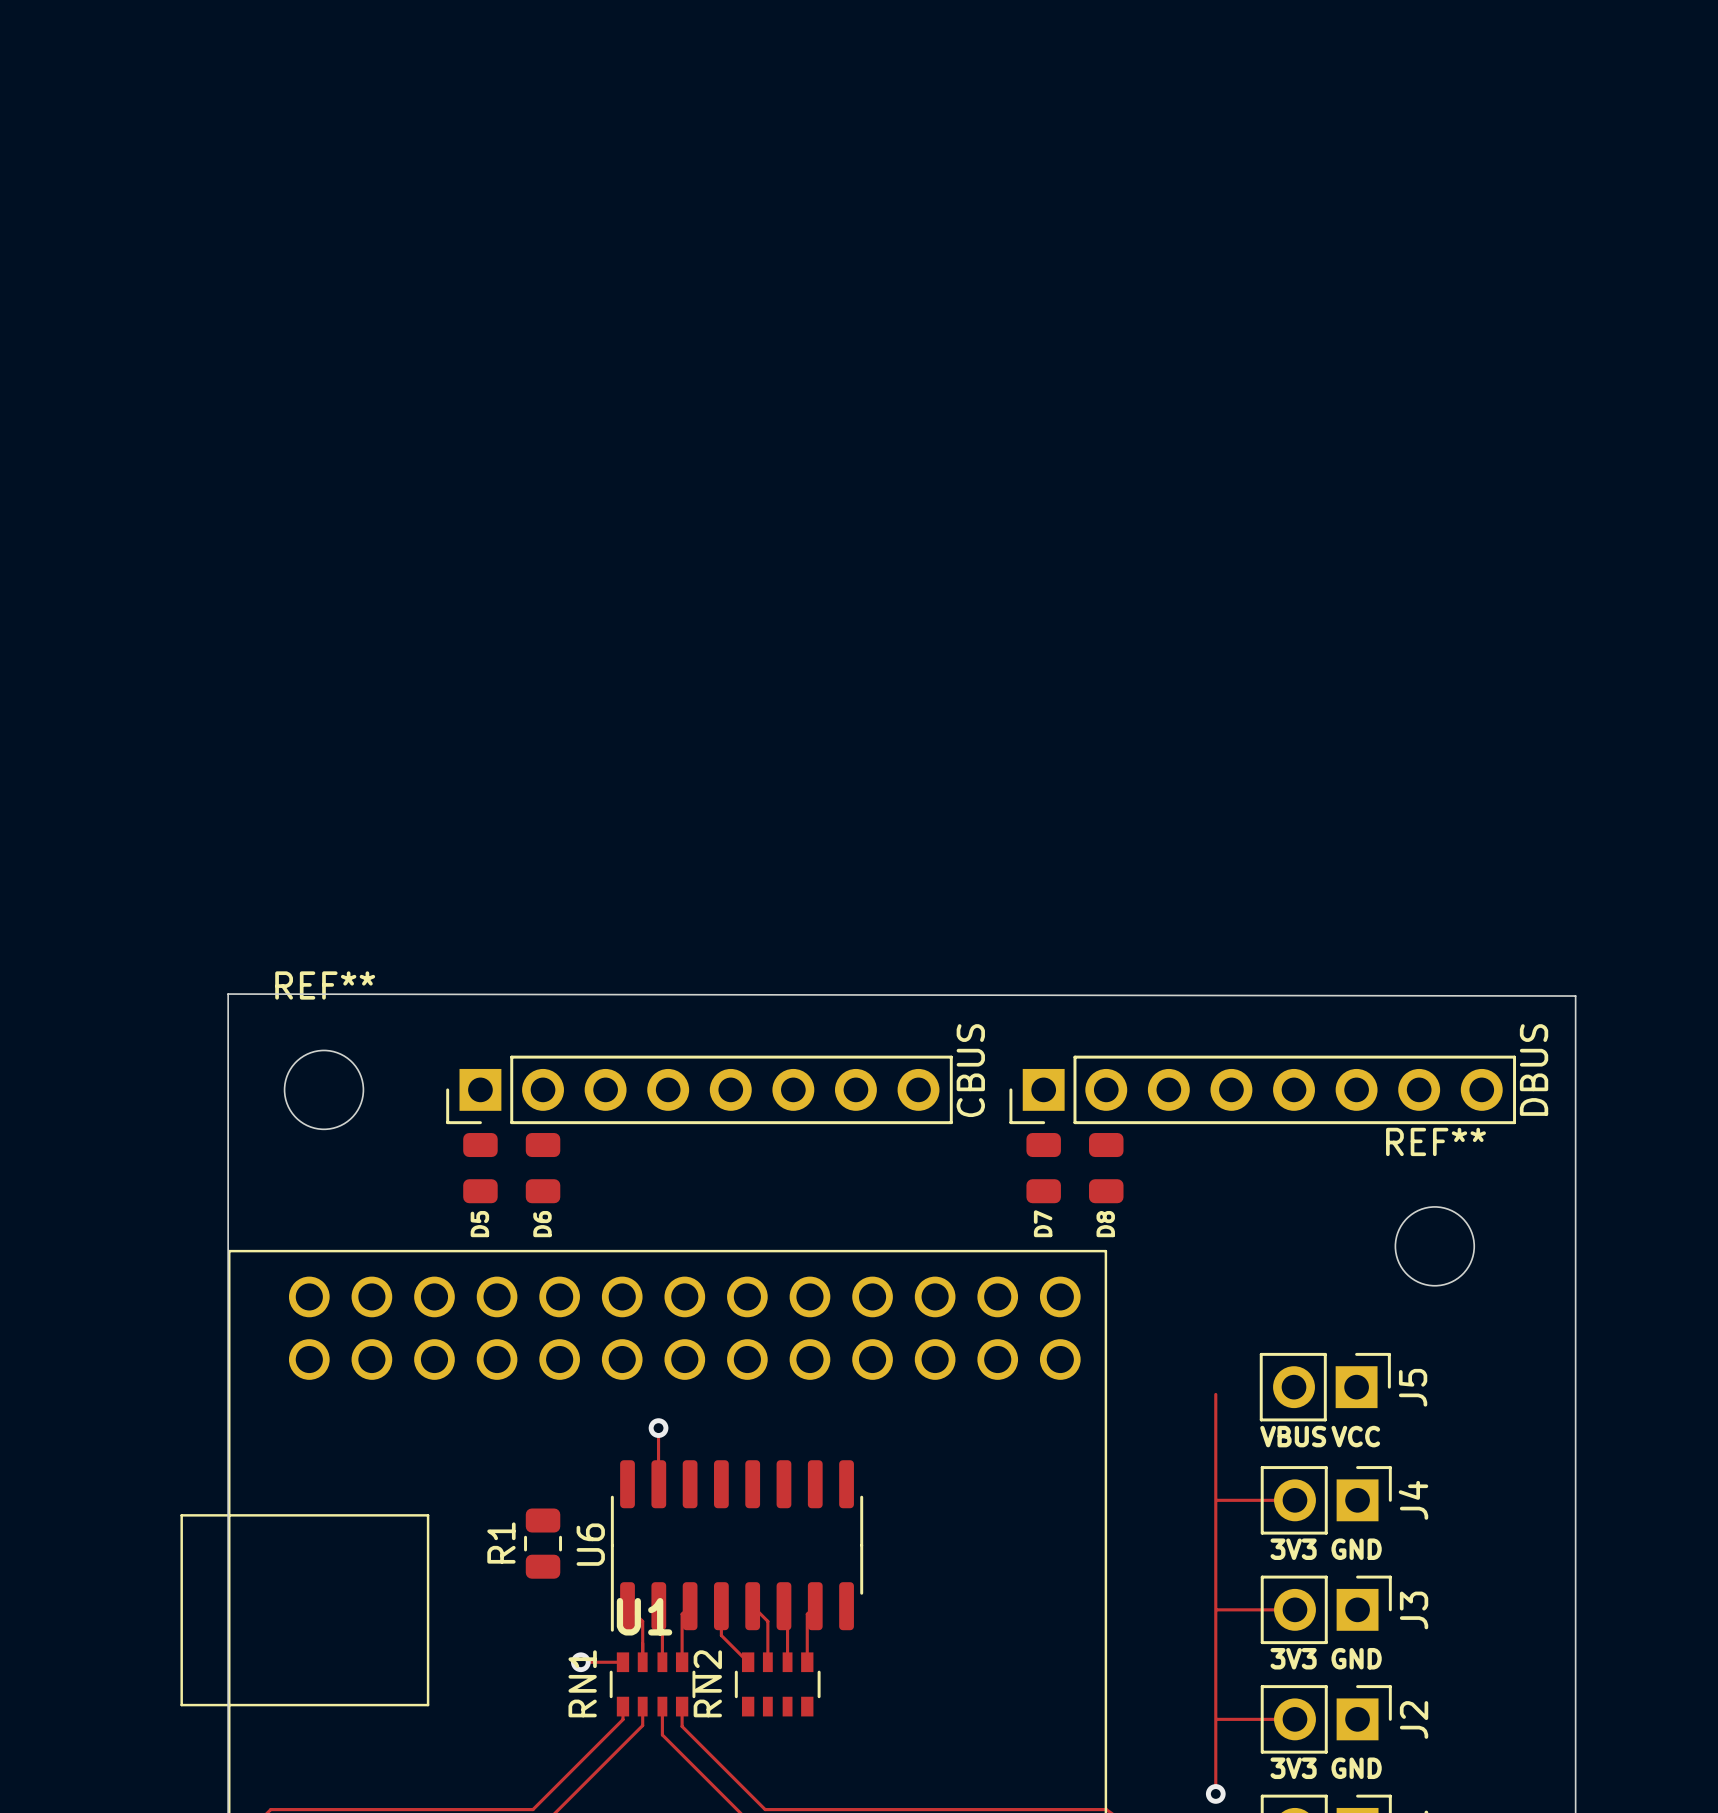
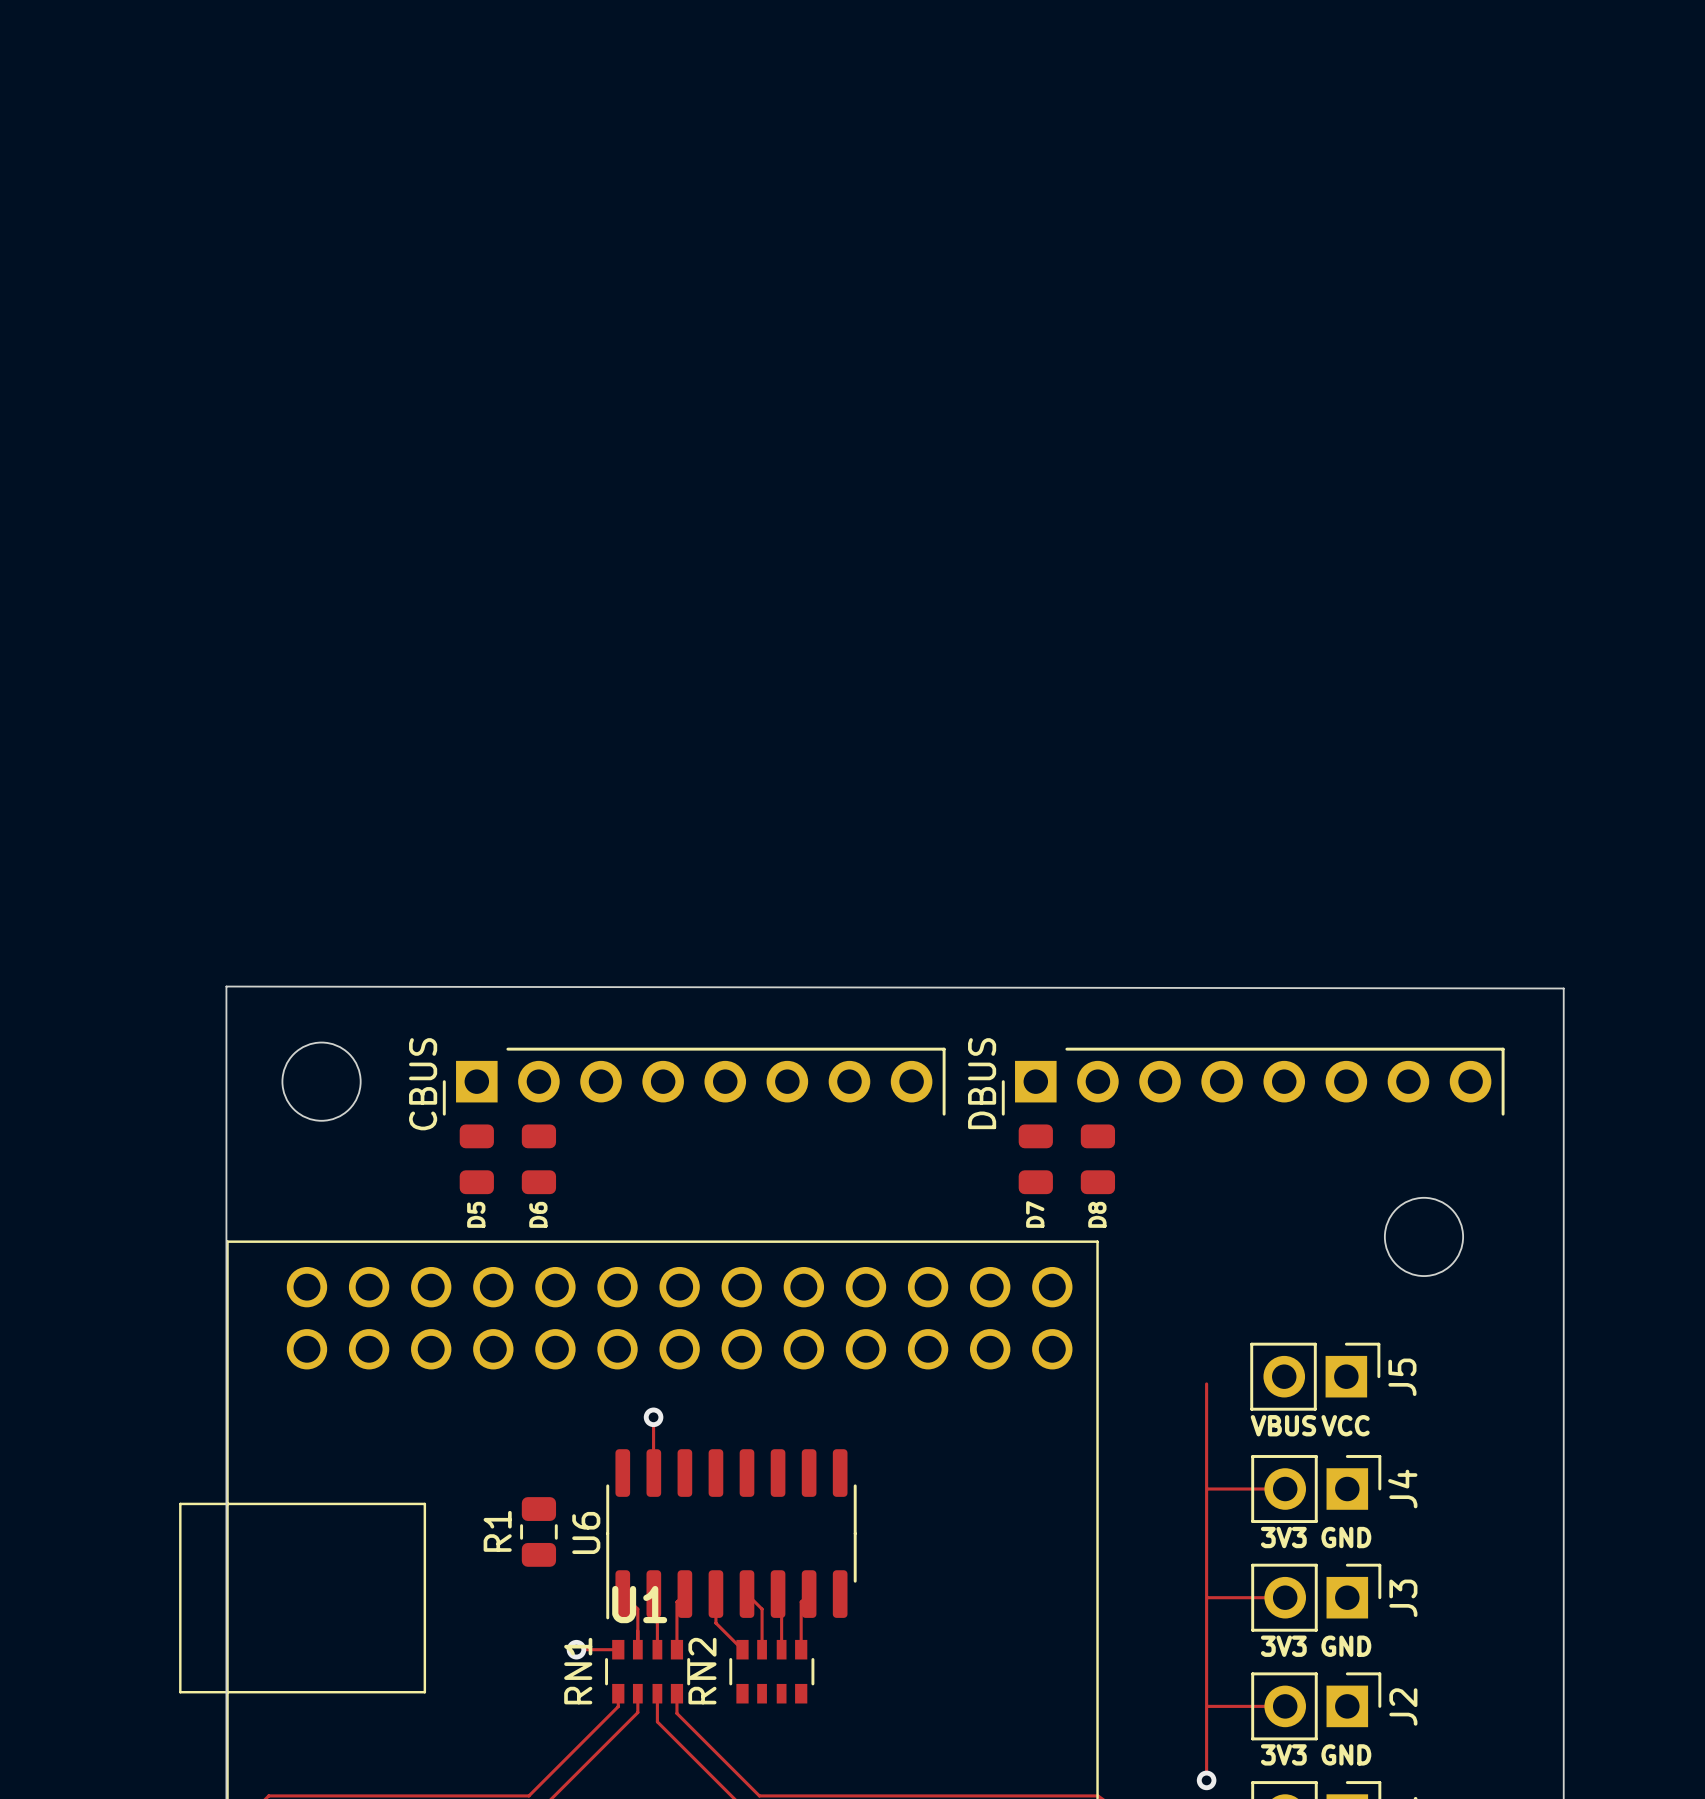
REF** name: REF** (325, 985) -> none
part footprint: [446, 1055, 953, 1125] -> [442, 1047, 946, 1116]
part footprint: [1009, 1055, 1517, 1125] -> [1001, 1047, 1505, 1116]
part value position: CBUS (970, 1070) -> CBUS (423, 1084)
part value position: DBUS (1534, 1070) -> DBUS (982, 1083)
REF** name: REF** (1435, 1141) -> none

